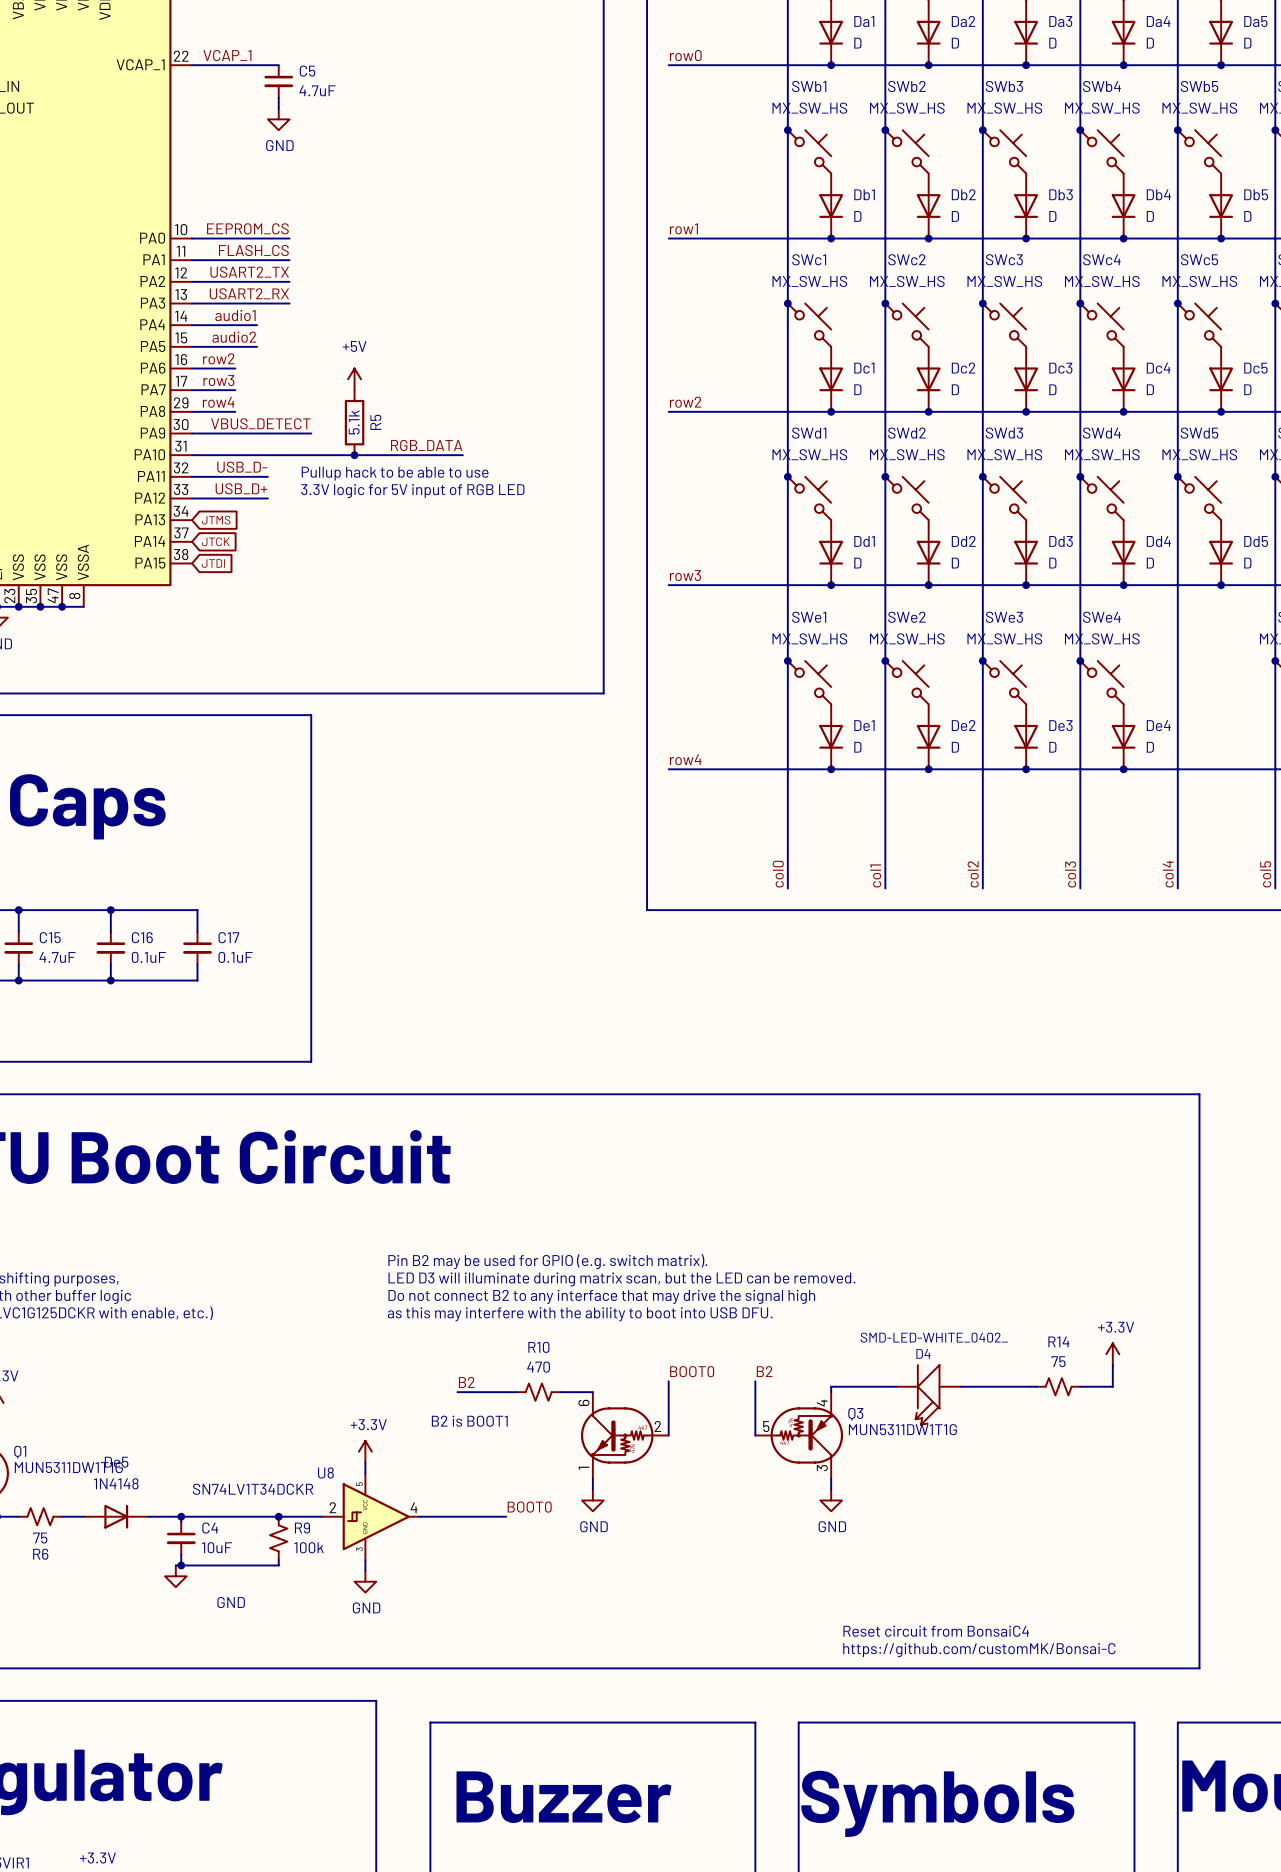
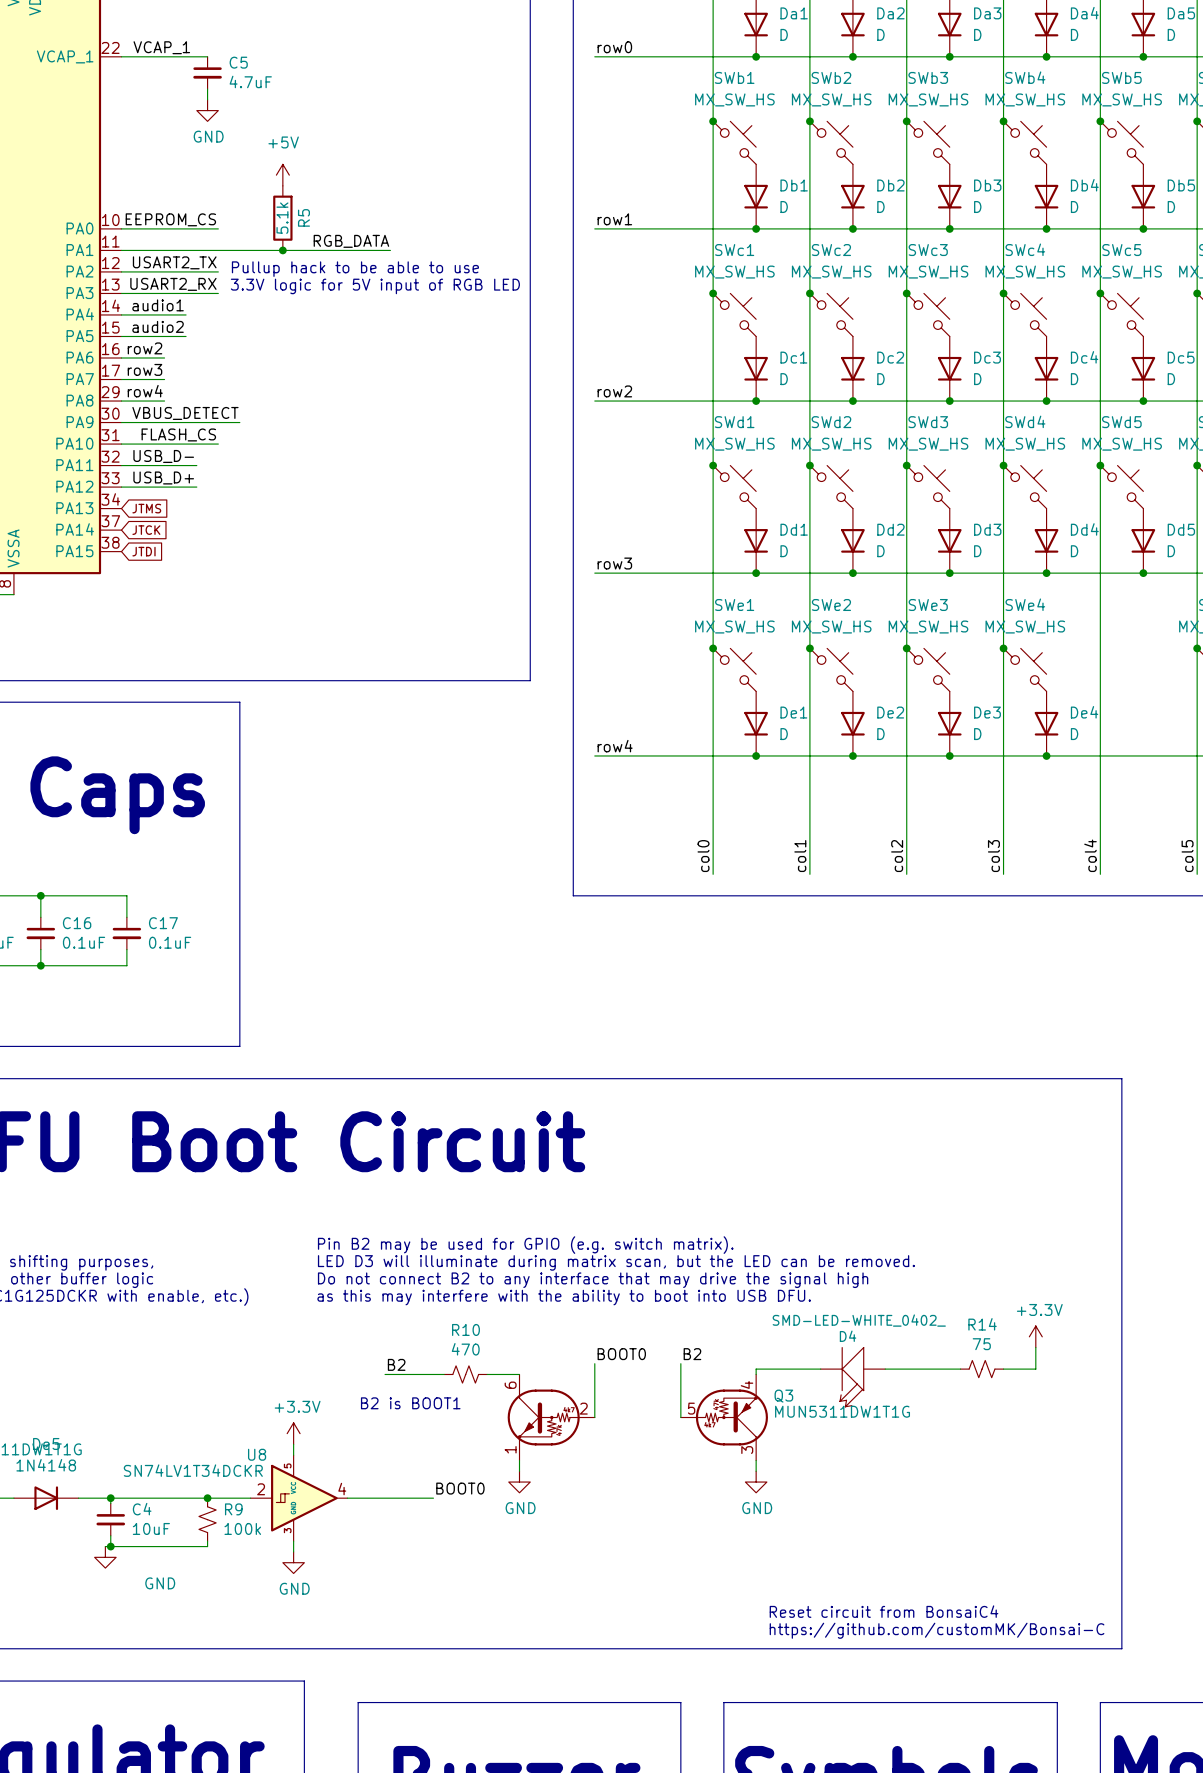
label position: FLASH_CS (253, 250) -> FLASH_CS (178, 434)
junction: none -> (282, 250)
power symbol position: +5V (354, 379) -> +5V (282, 175)
R5 position: (354, 422) -> (282, 218)
label position: RGB_DATA (426, 445) -> RGB_DATA (351, 241)
wire: (289, 455) (462, 455) -> (218, 250) (390, 250)
junction: (354, 455) -> none
text position: Pullup hack to be able to use (395, 473) -> Pullup hack to be able to use (355, 269)
text position: 3.3V logic for 5V input of RGB LED (412, 491) -> 3.3V logic for 5V input of RGB LED (375, 286)

